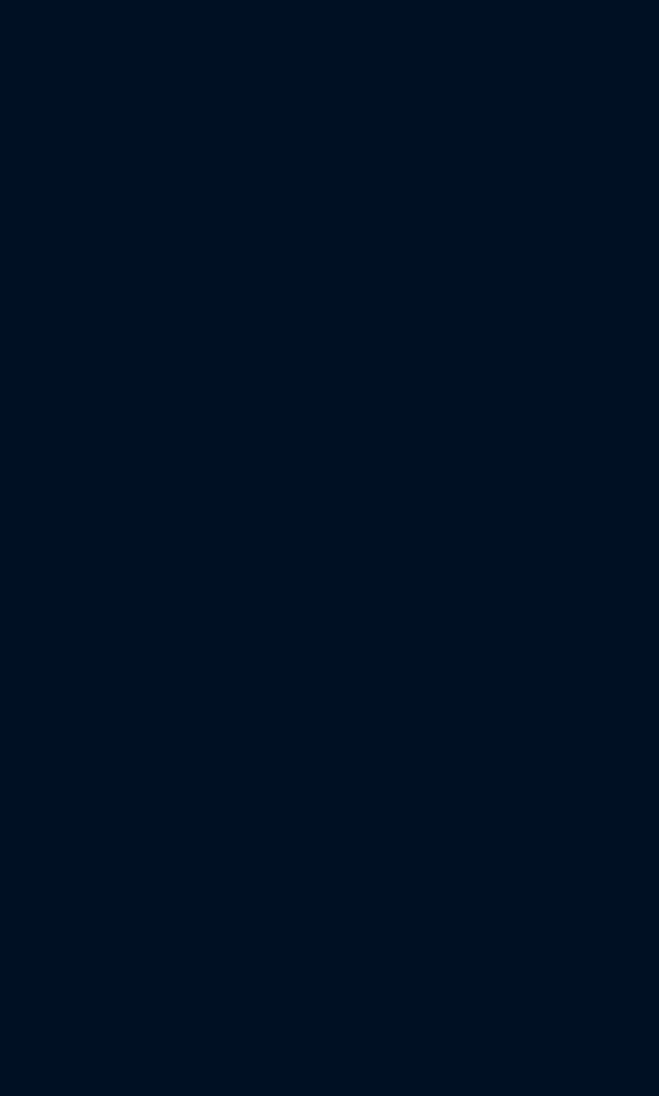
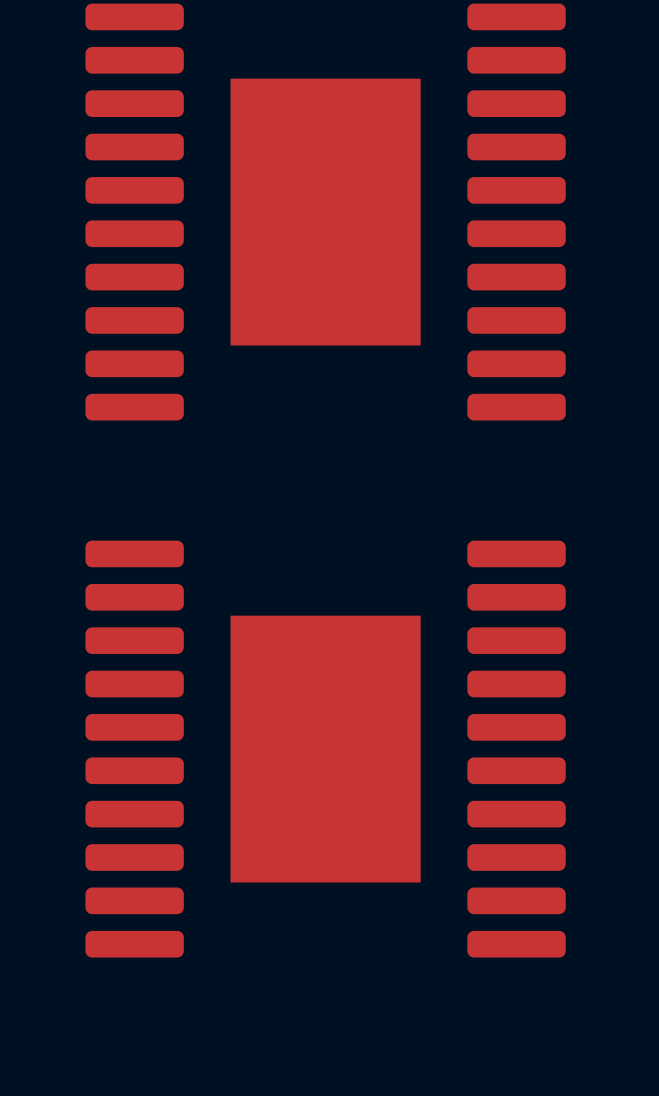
part: none -> (325, 212)
part: none -> (325, 749)

